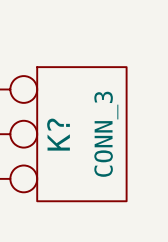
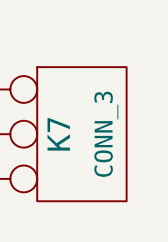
K? name: K? (58, 134) -> K7 (58, 134)

